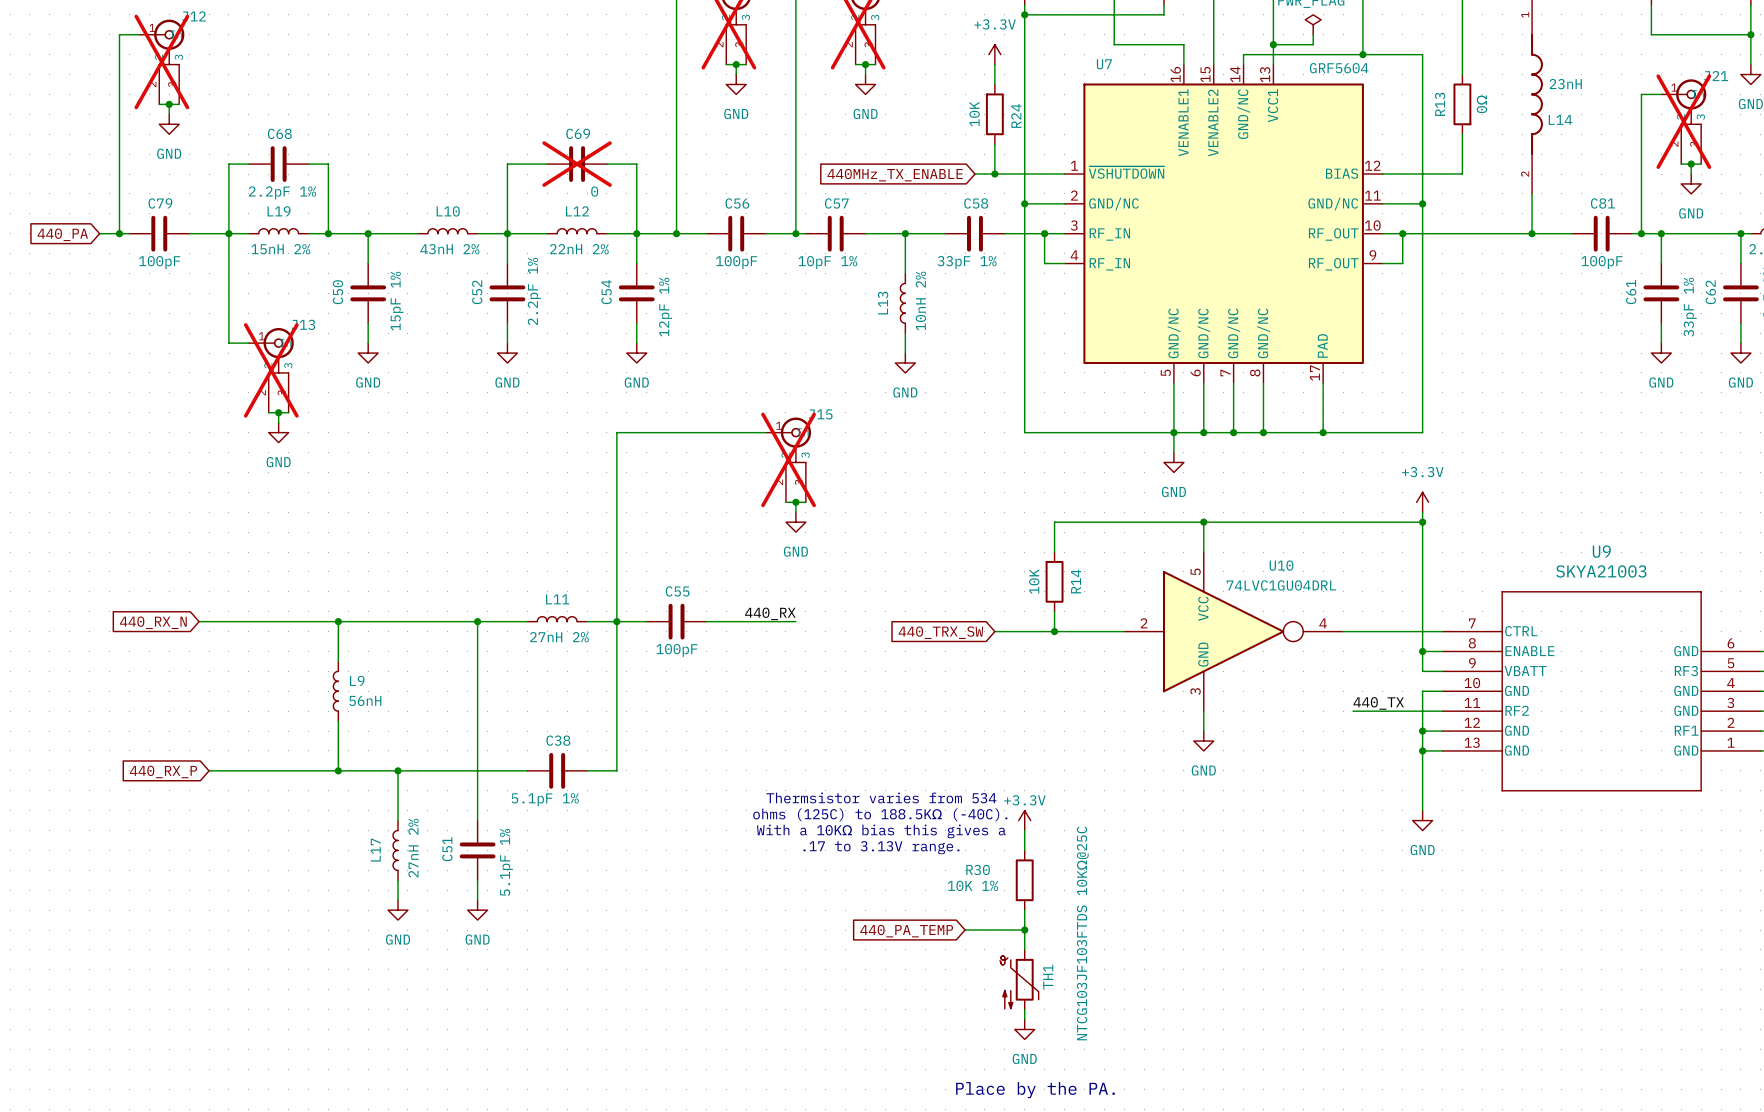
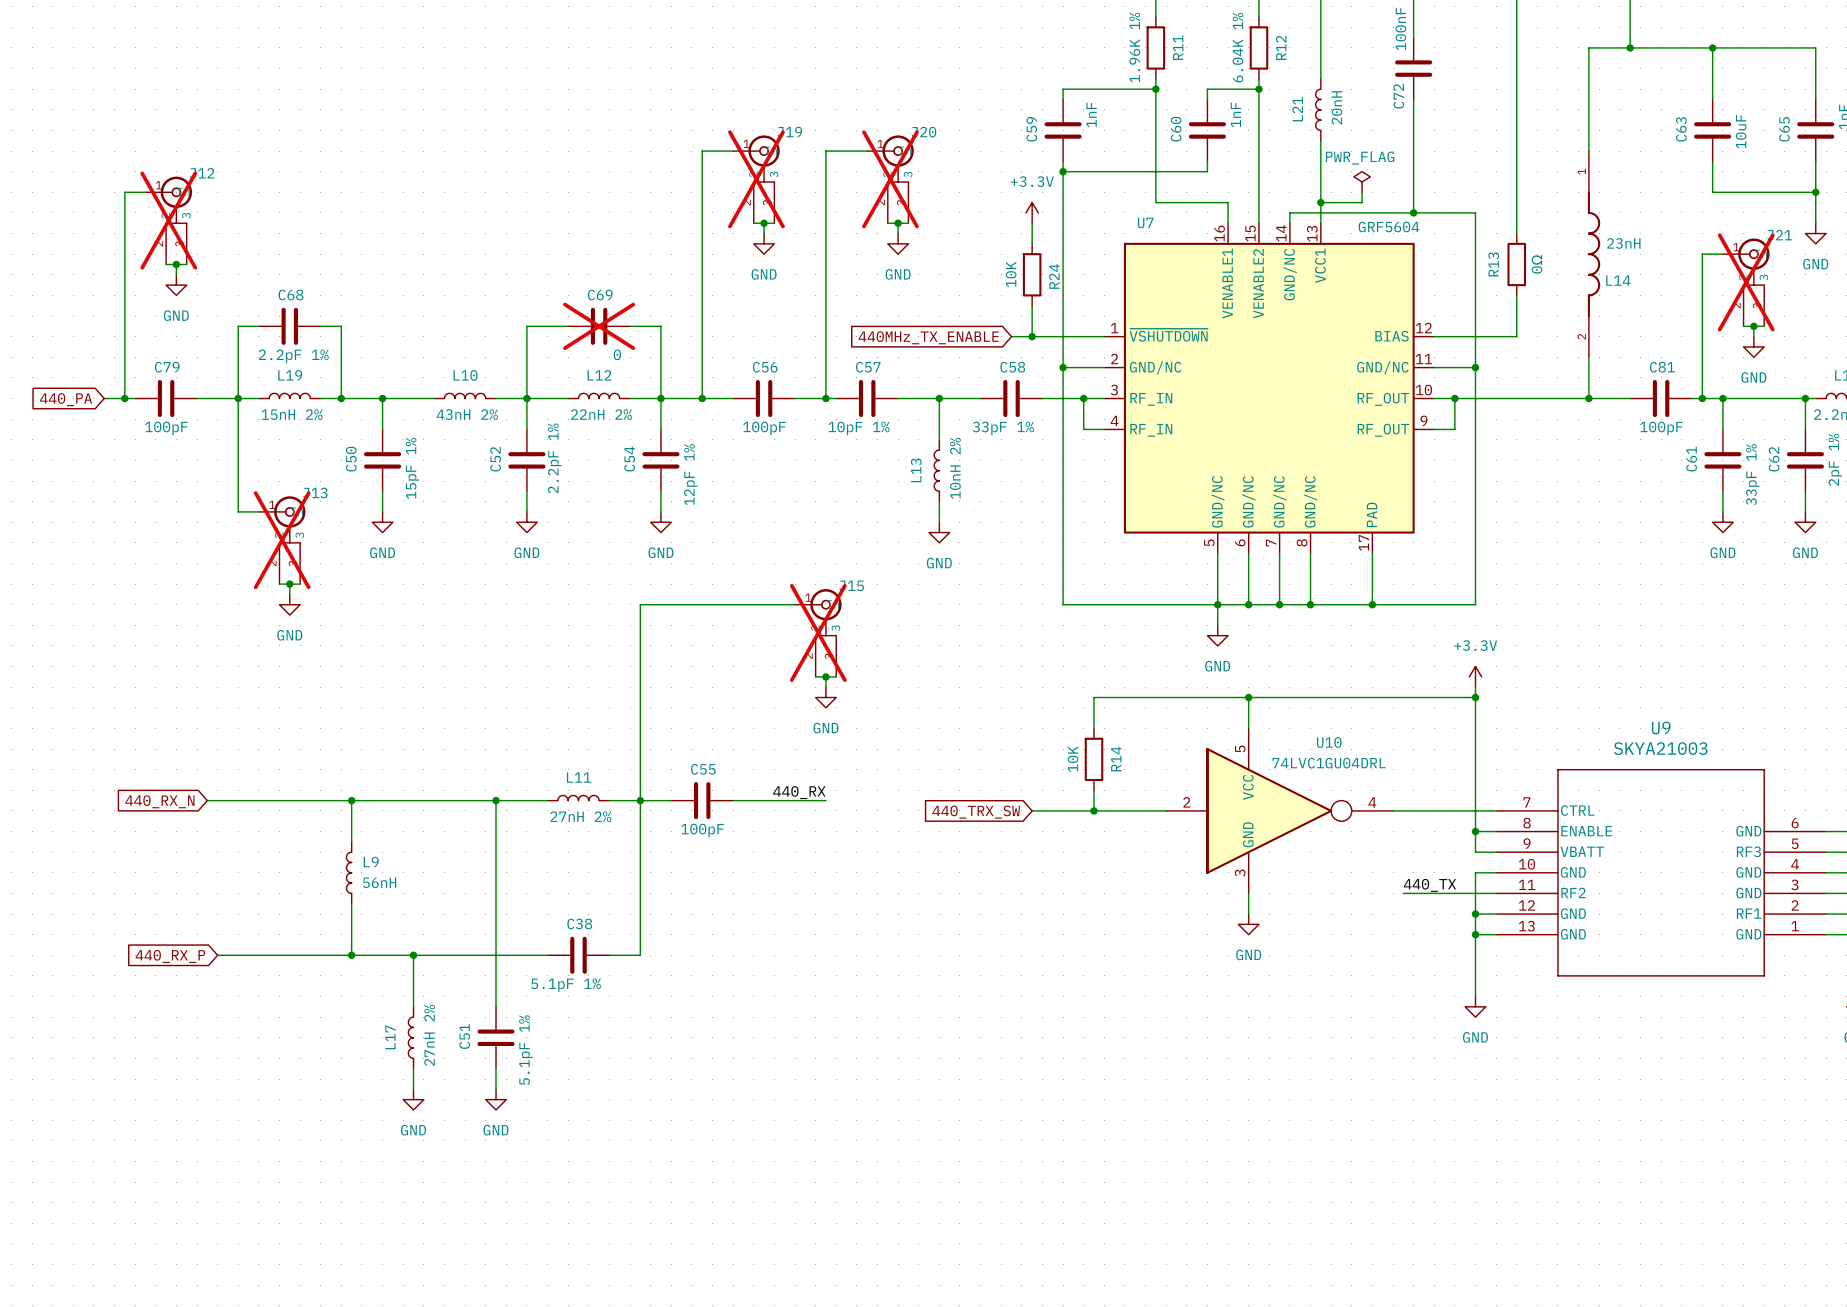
text: Thermsistor varies from 534 (881, 797) -> none
text: ohms (125C) to 188.5KΩ (-40C). (880, 814) -> none
power symbol: +3.3V (1024, 820) -> none
wire: (1024, 830) (1024, 850) -> none
text: With a 10KΩ bias this gives a (881, 831) -> none
text: .17 to 3.13V range. (881, 847) -> none
R30: 10K 1% (1024, 880) -> none
wire: (1024, 910) (1024, 949) -> none
wire: (965, 930) (1024, 930) -> none
junction: (1024, 930) -> none
global label: 440_PA_TEMP (906, 931) -> none
TH1: NTCG103JF103FTDS 10KΩ@25C (1019, 979) -> none
wire: (1024, 1009) (1024, 1019) -> none
power symbol: GND (1024, 1029) -> none
text: Place by the PA. (1035, 1090) -> none

